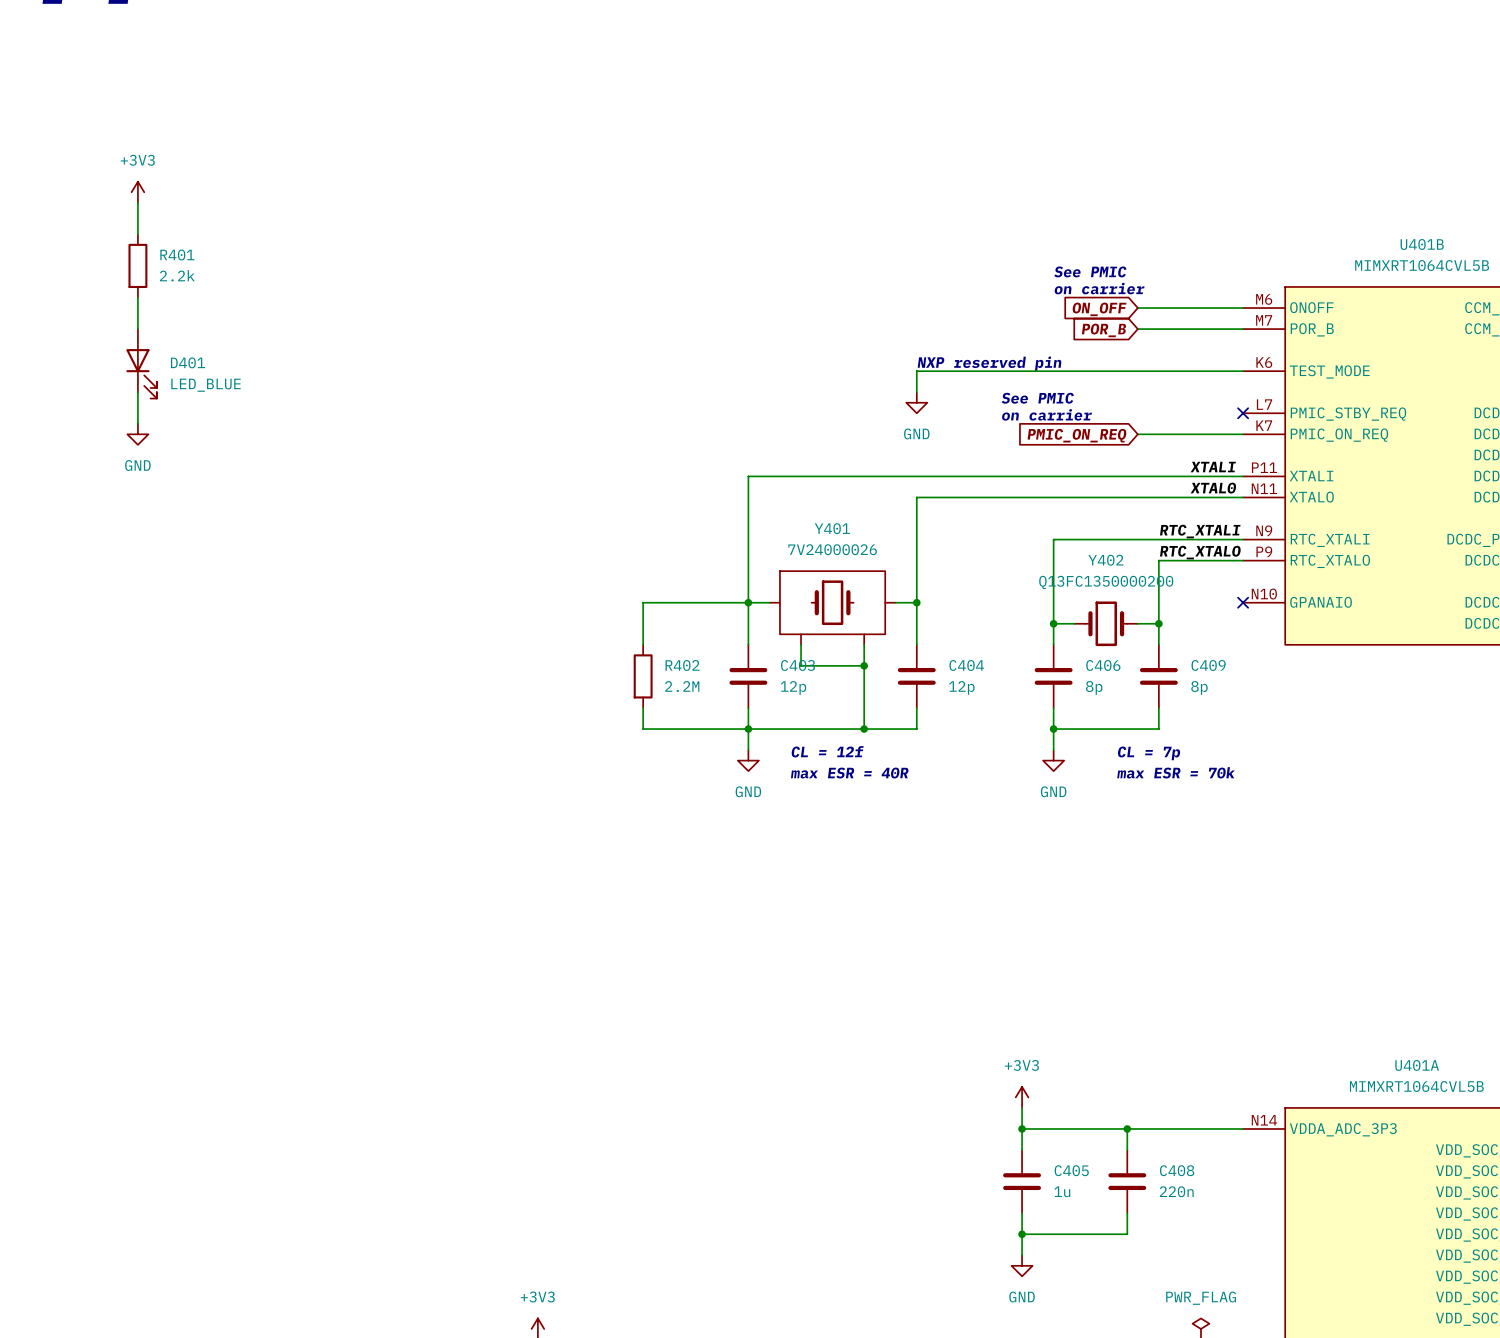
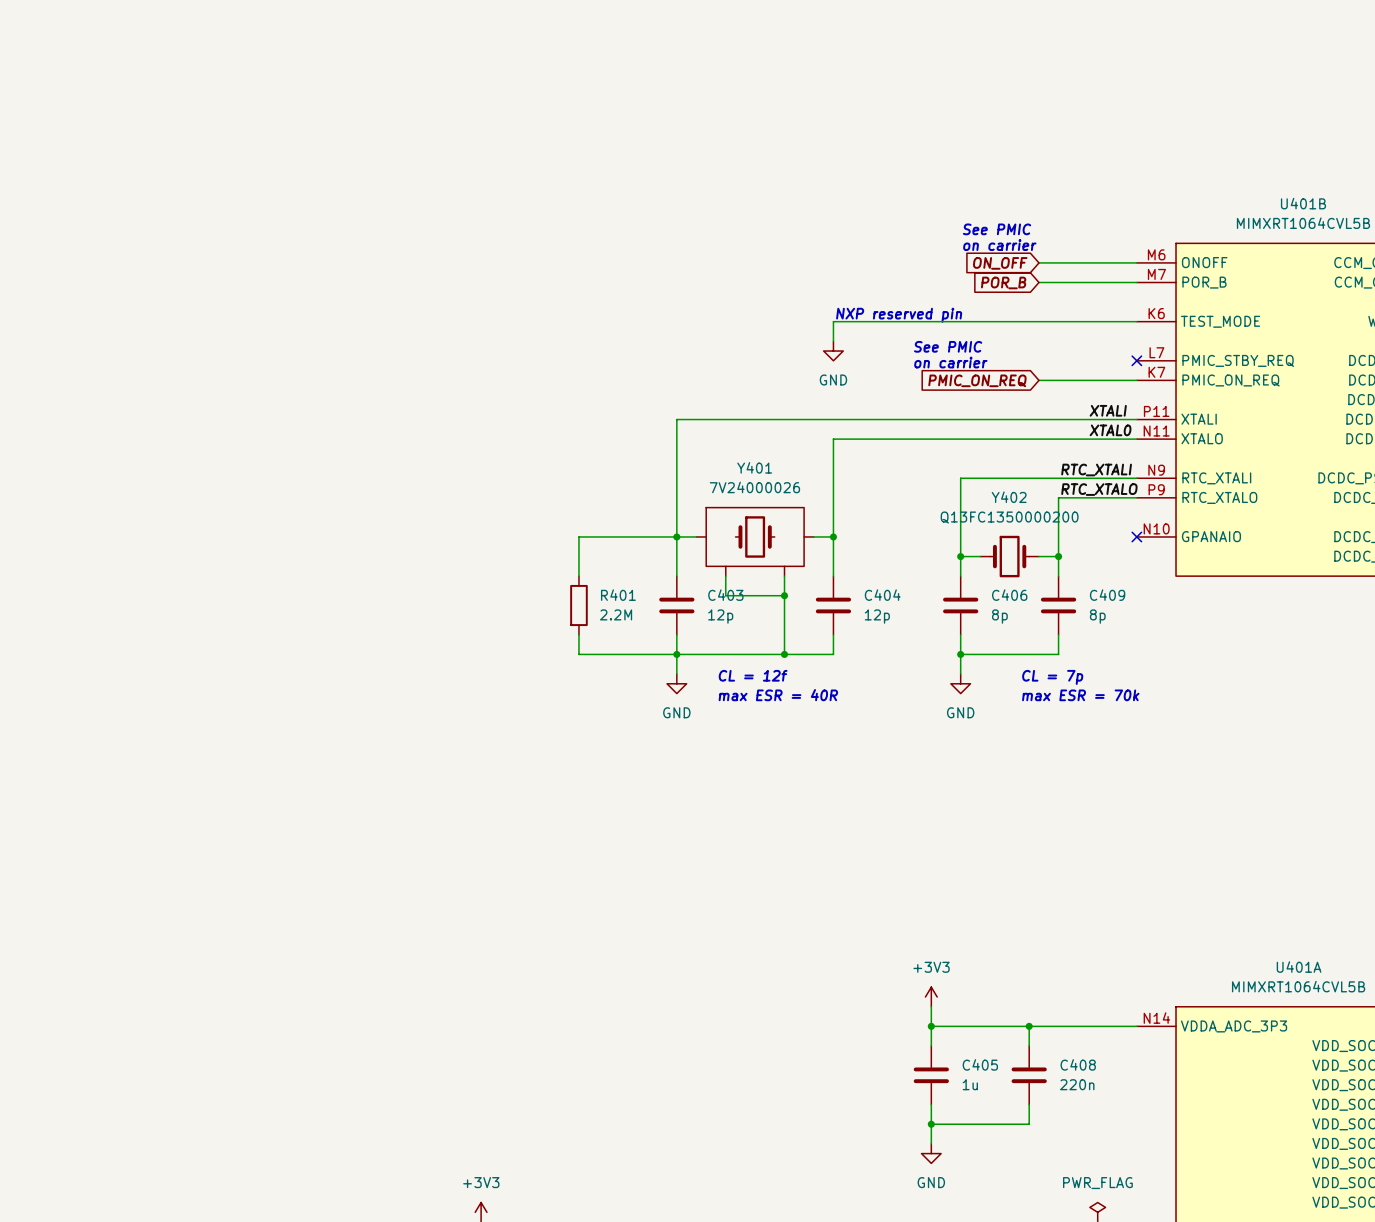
power symbol: +3V3 (137, 192) -> none
wire: (137, 202) (137, 234) -> none
R401: 2.2k (137, 265) -> none
wire: (137, 297) (137, 329) -> none
D401: LED_BLUE (141, 363) -> none
wire: (137, 392) (137, 423) -> none
power symbol: GND (137, 434) -> none
R402 name: R402 (682, 665) -> R401 (618, 595)

